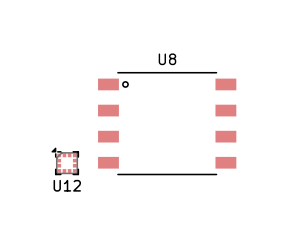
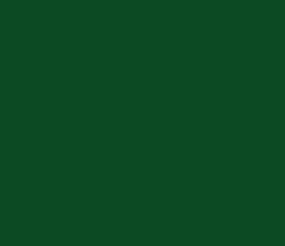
U8: (167, 123) -> none
U12: (65, 161) -> none

